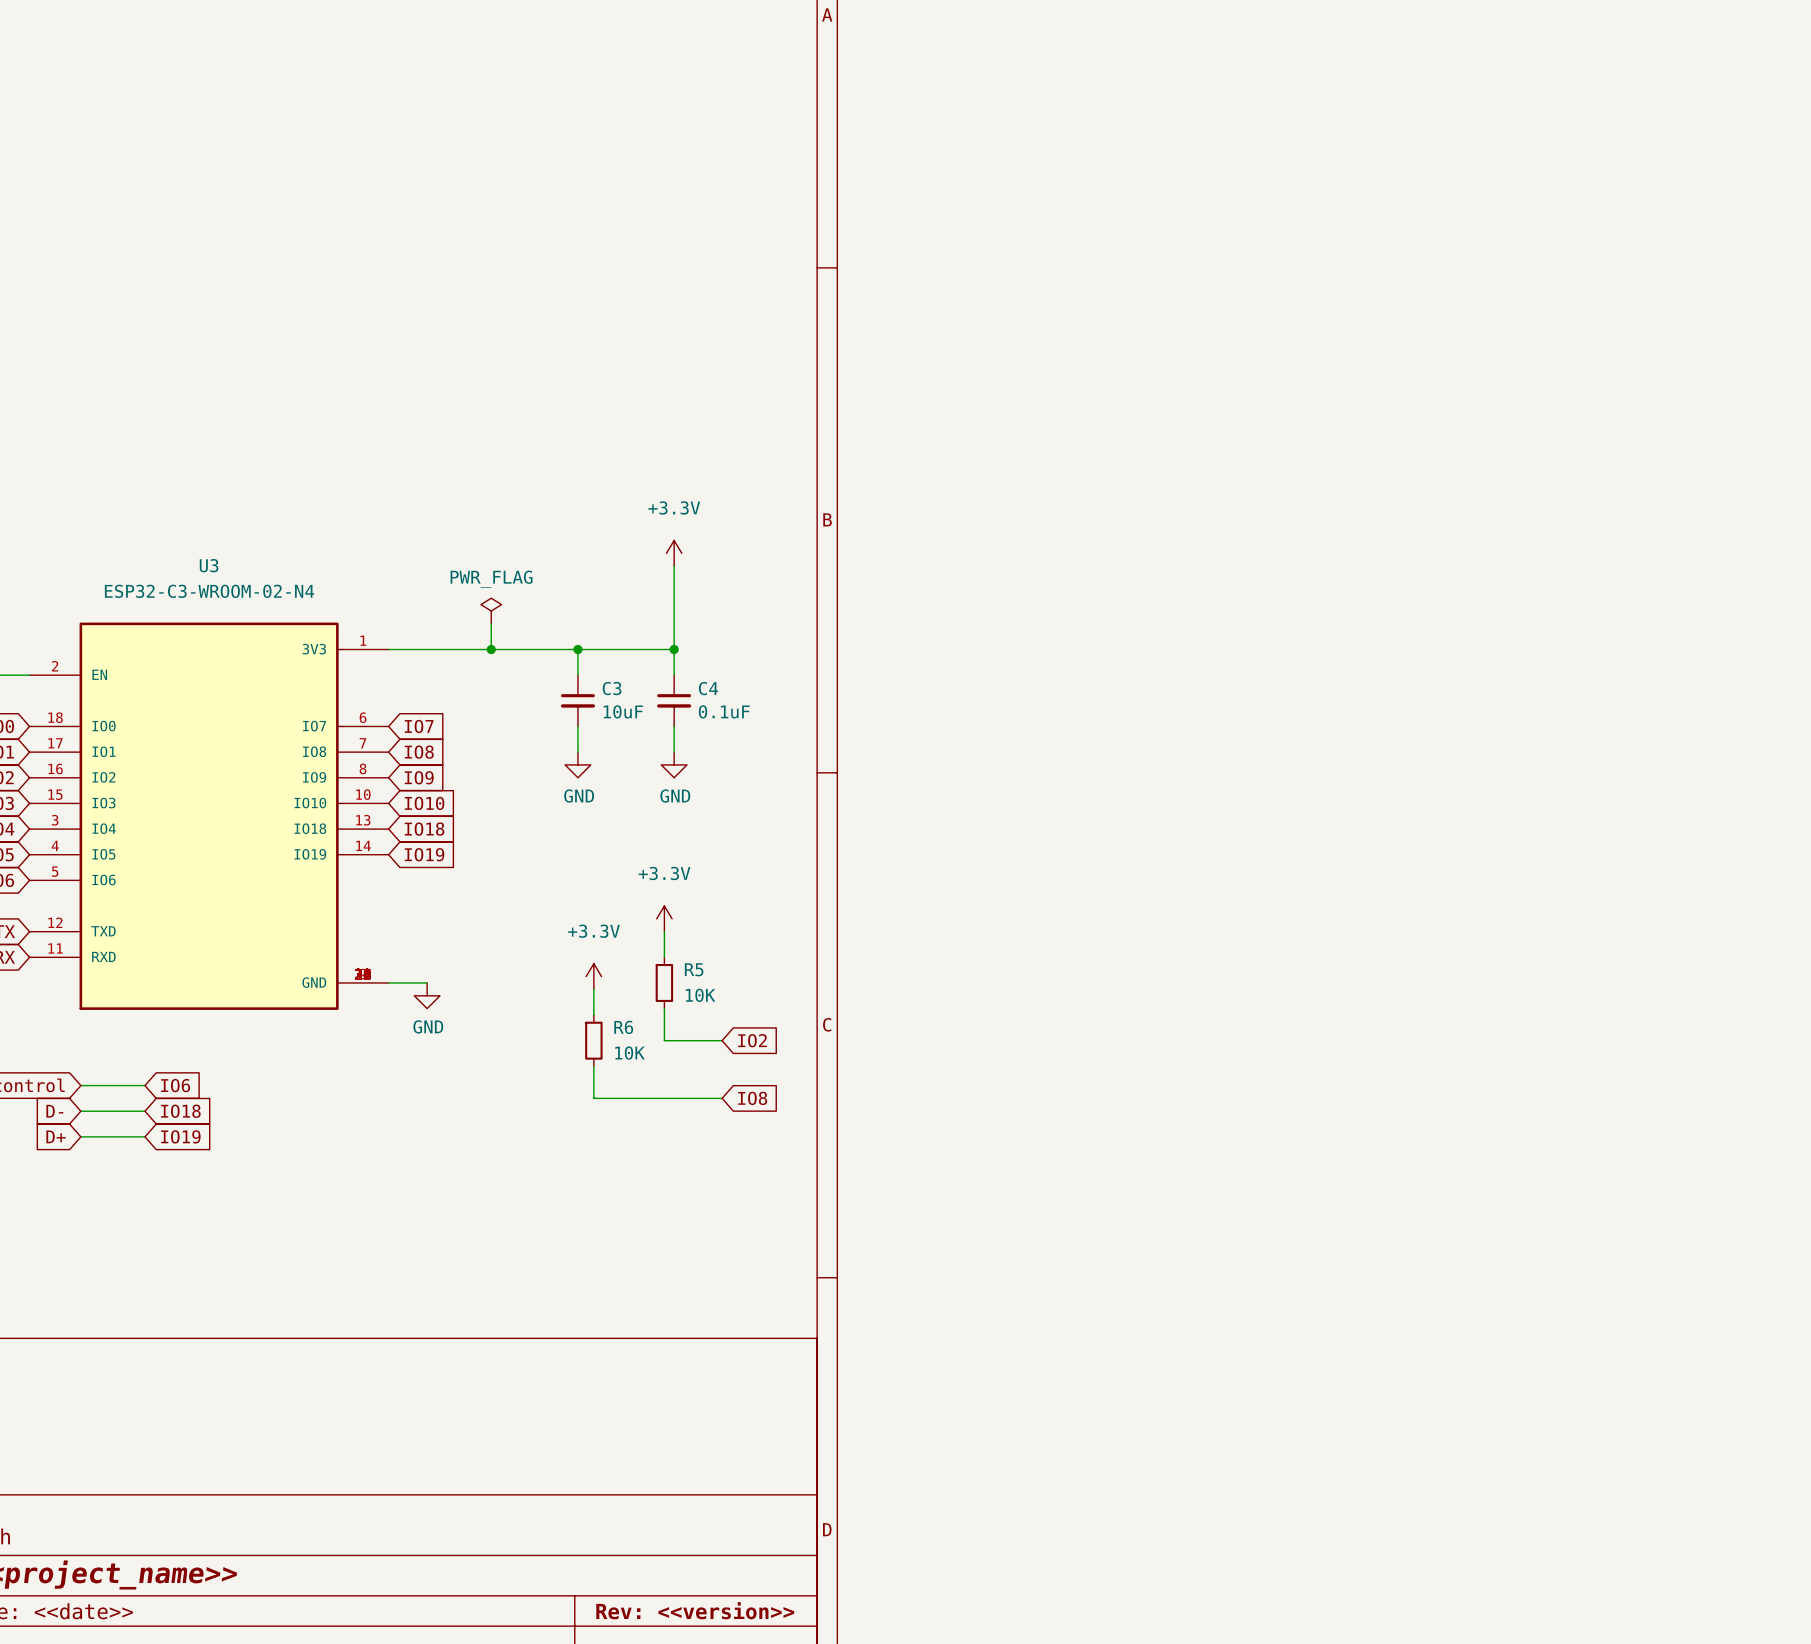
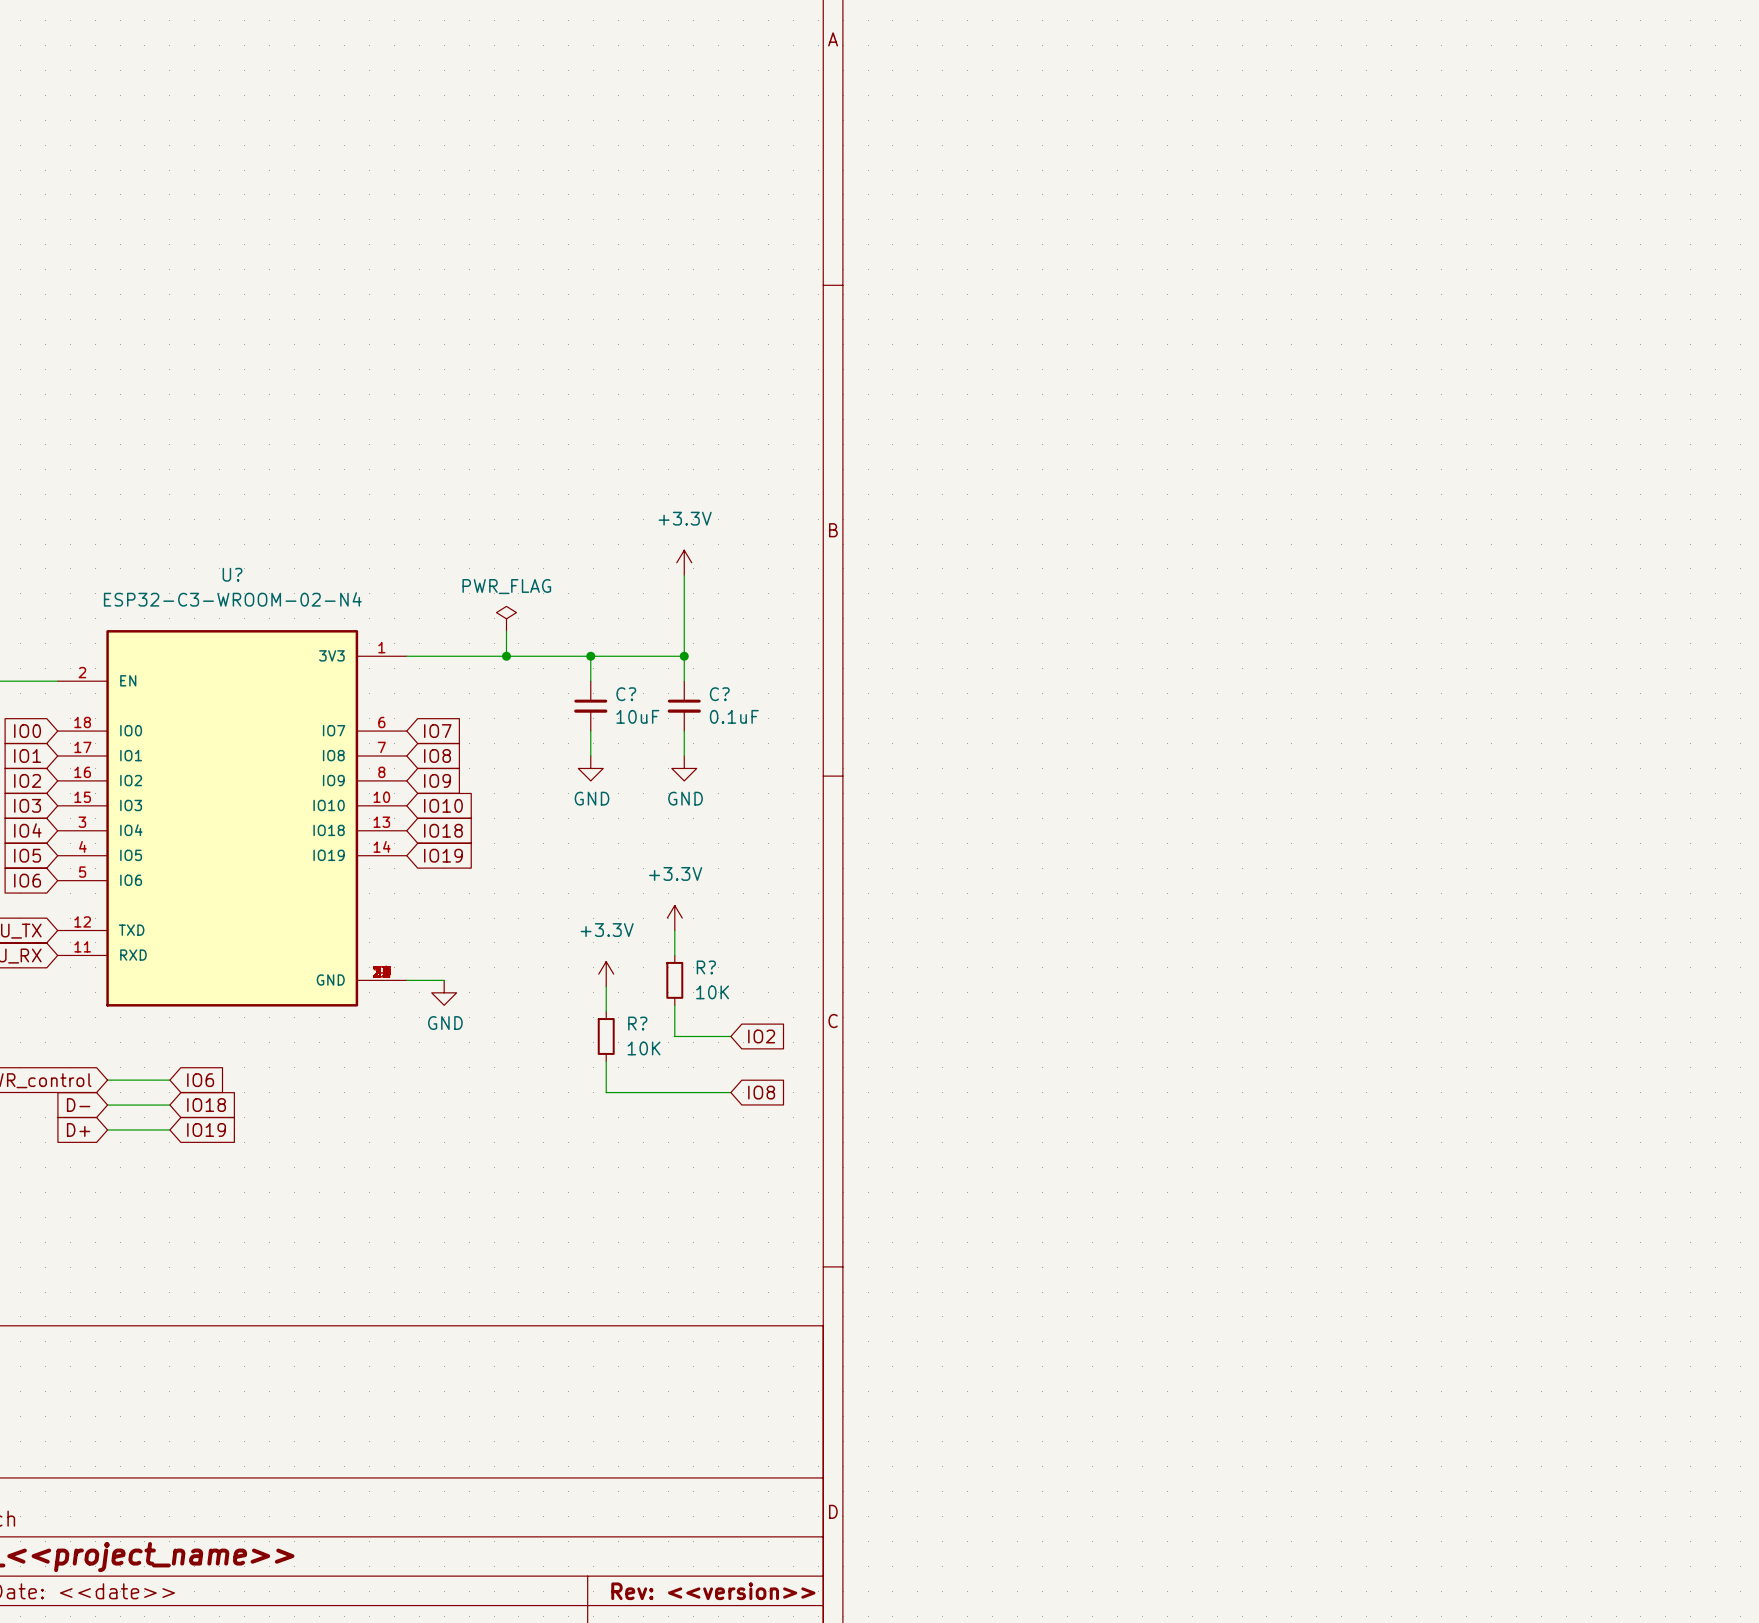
U3 name: U3 (209, 565) -> U? (232, 574)
C3 name: C3 (612, 688) -> C? (626, 694)
C4 name: C4 (708, 688) -> C? (719, 694)
R5 name: R5 (694, 969) -> R? (706, 967)
R6 name: R6 (623, 1027) -> R? (637, 1023)

